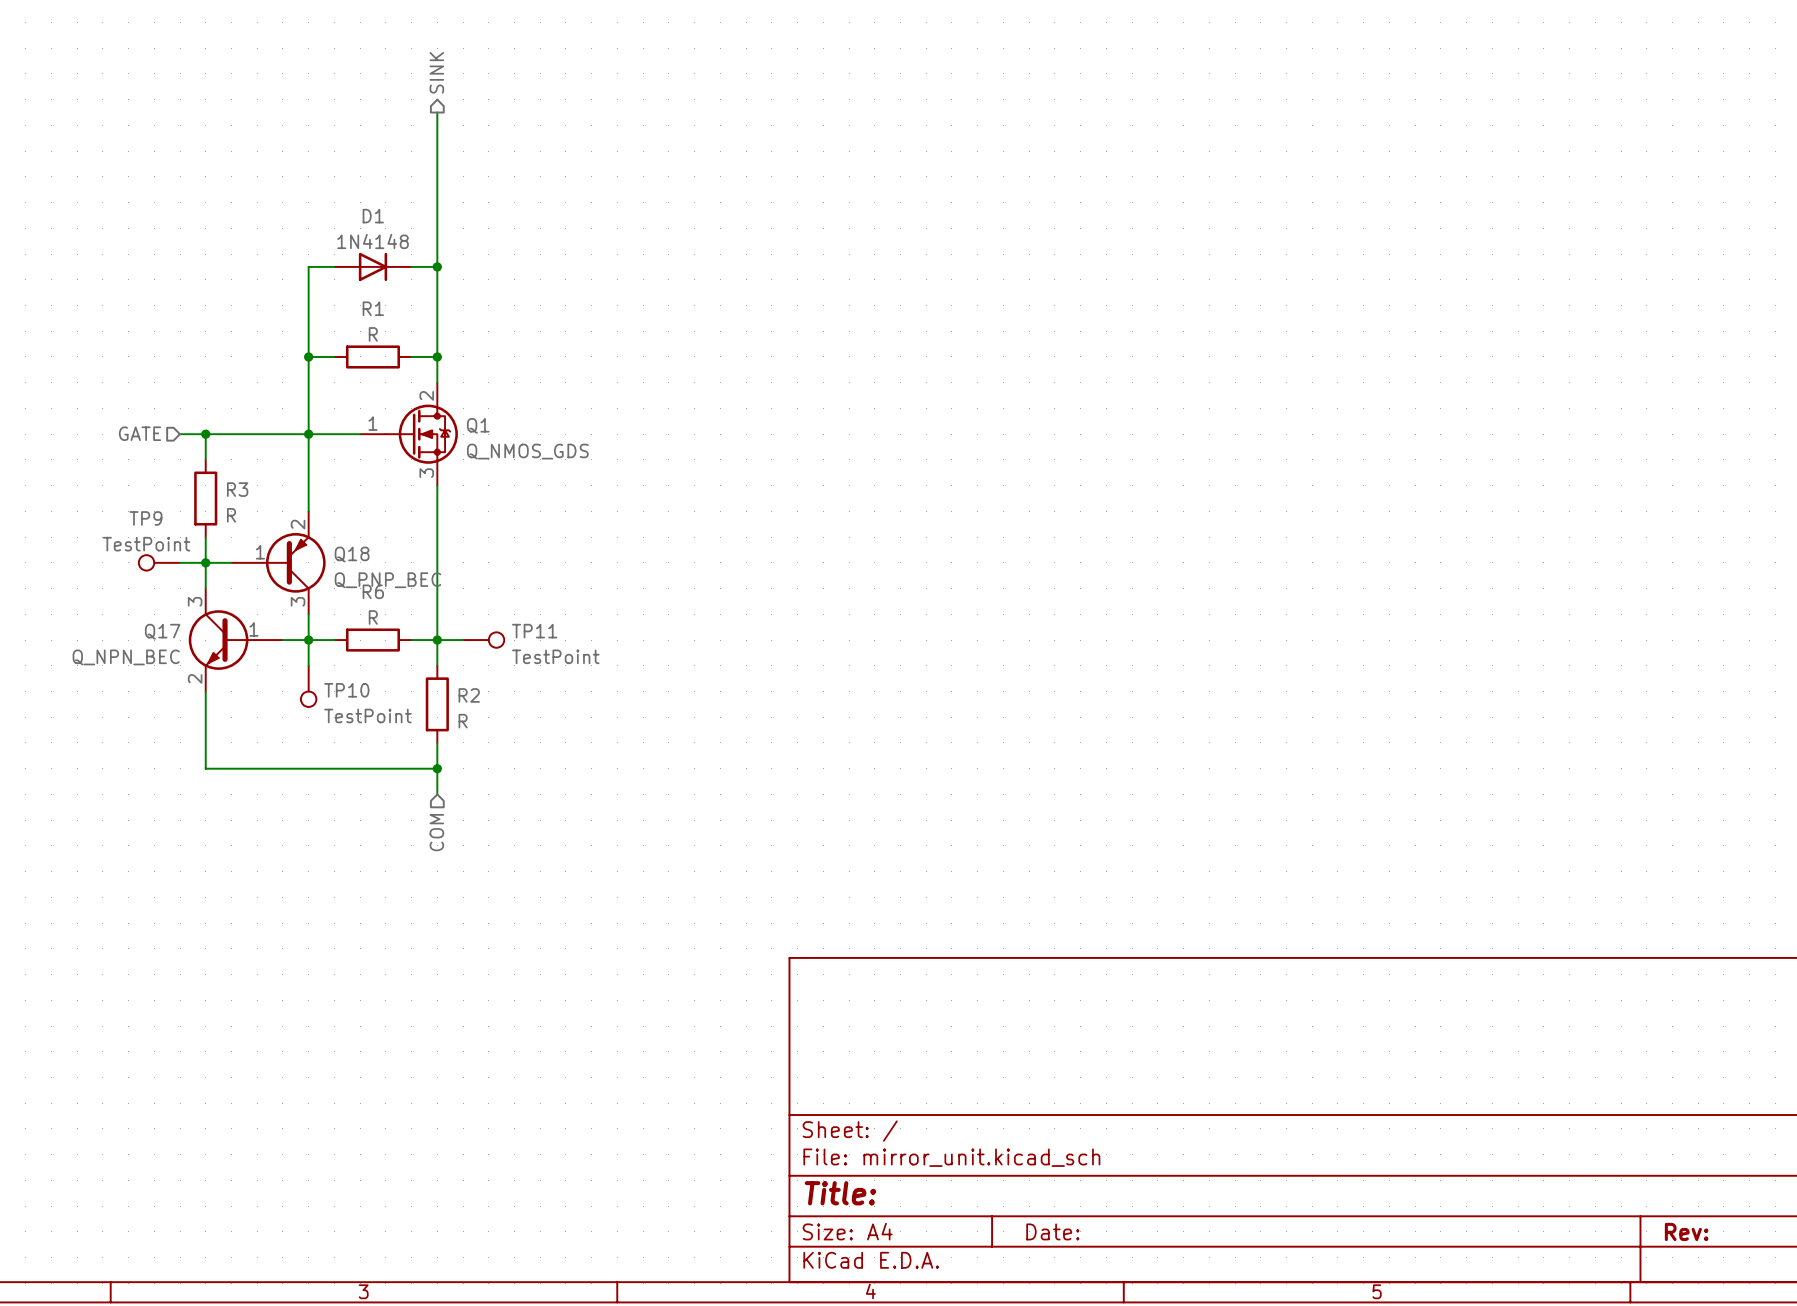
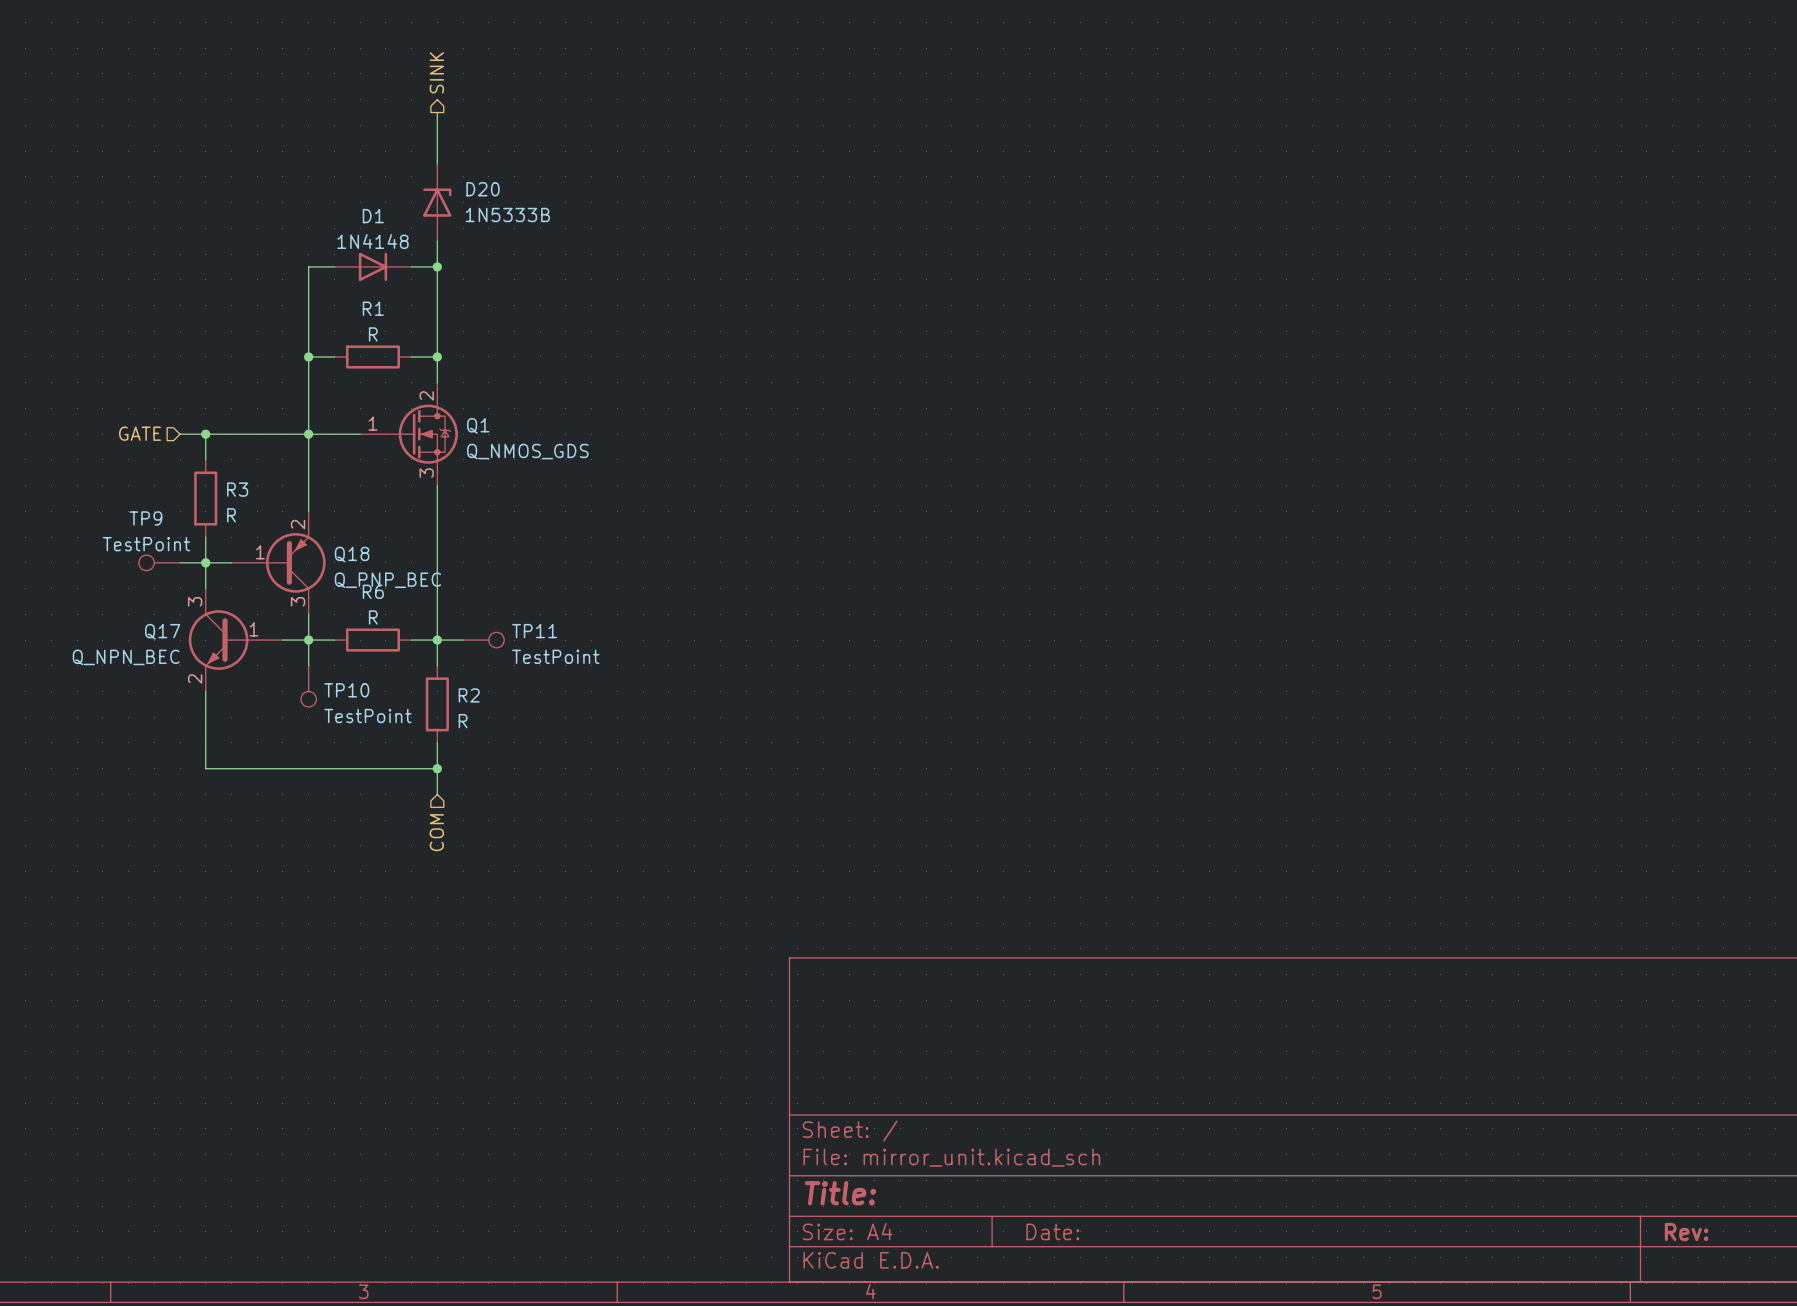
D20: none -> 1N5333B (437, 202)

